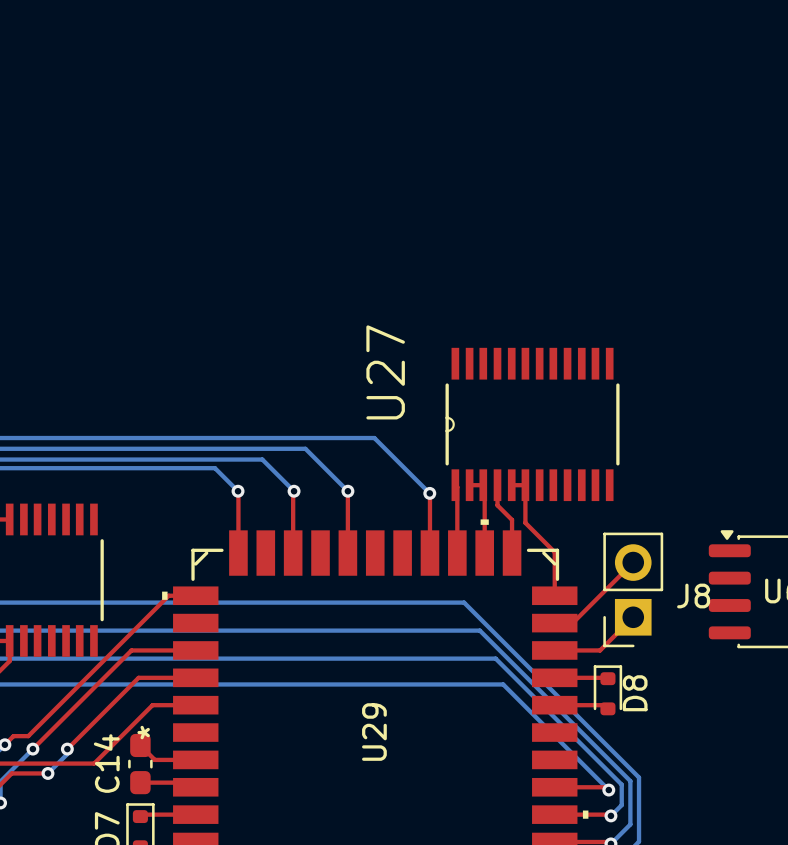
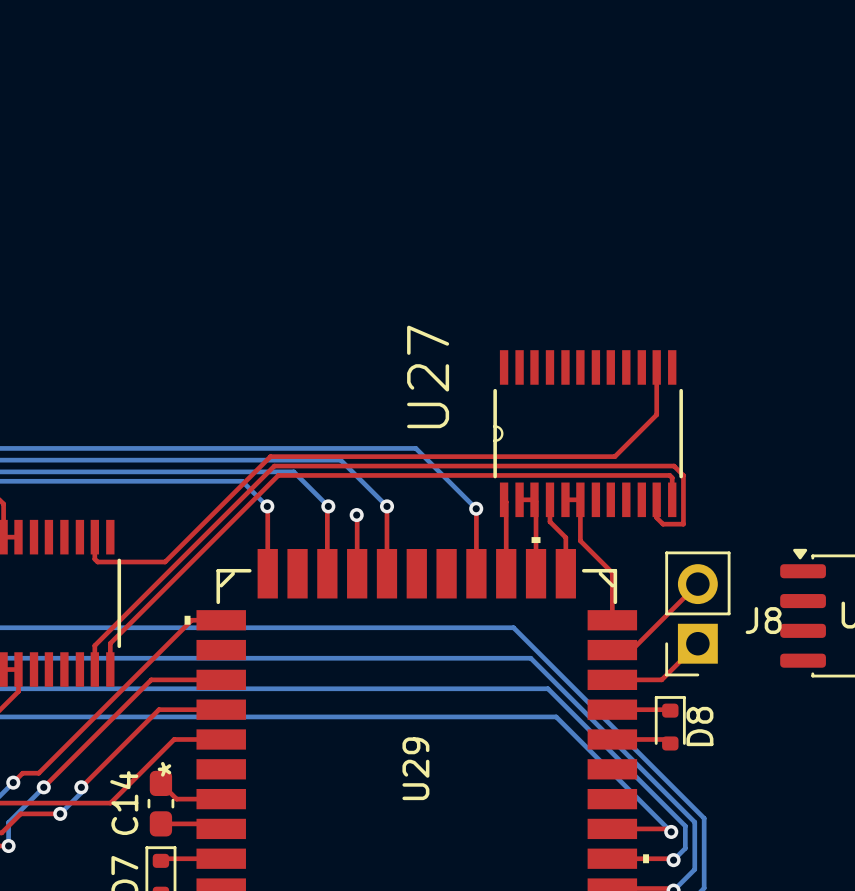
top track: none -> (656, 367) (656, 414) (614, 456) (270, 456) (165, 562) (97, 562) (94, 559) (94, 537)
top track: none -> (656, 499) (656, 517) (663, 524) (683, 524) (683, 475) (674, 466) (274, 466) (94, 645) (94, 669)
top track: none -> (672, 499) (672, 477) (669, 475) (278, 475) (110, 643) (110, 669)
top track: none -> (356, 515) (357, 573)
via: none -> (356, 515)

